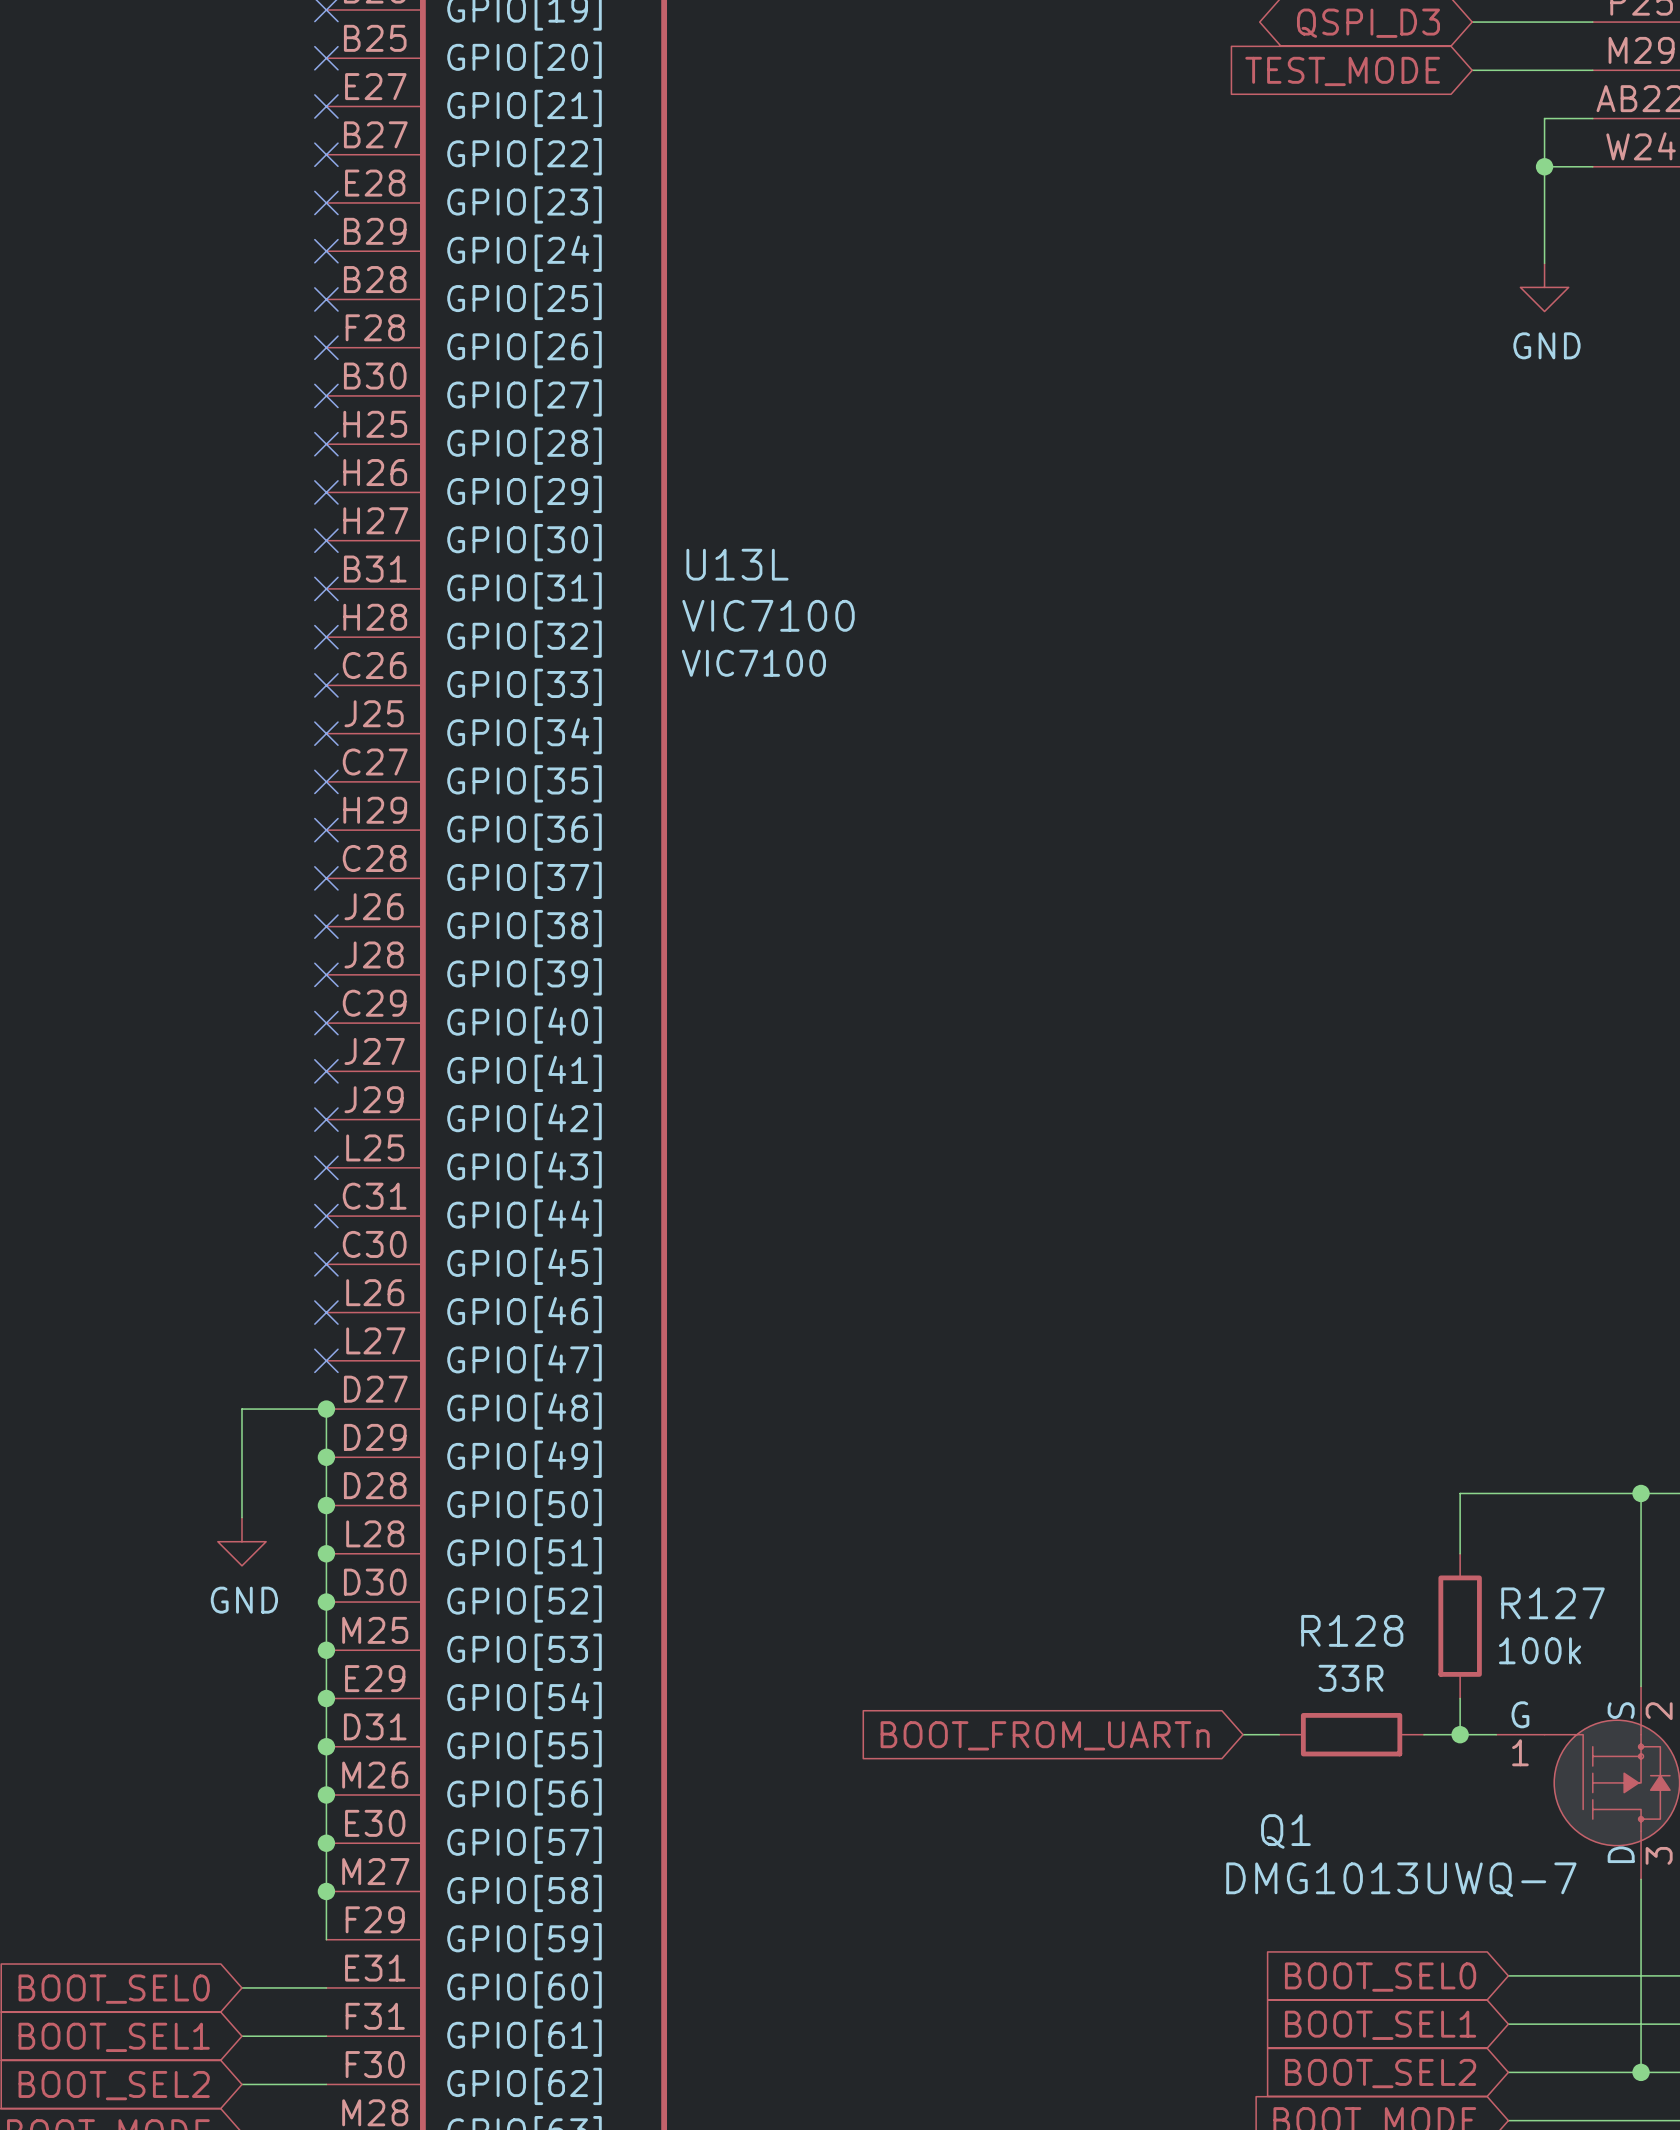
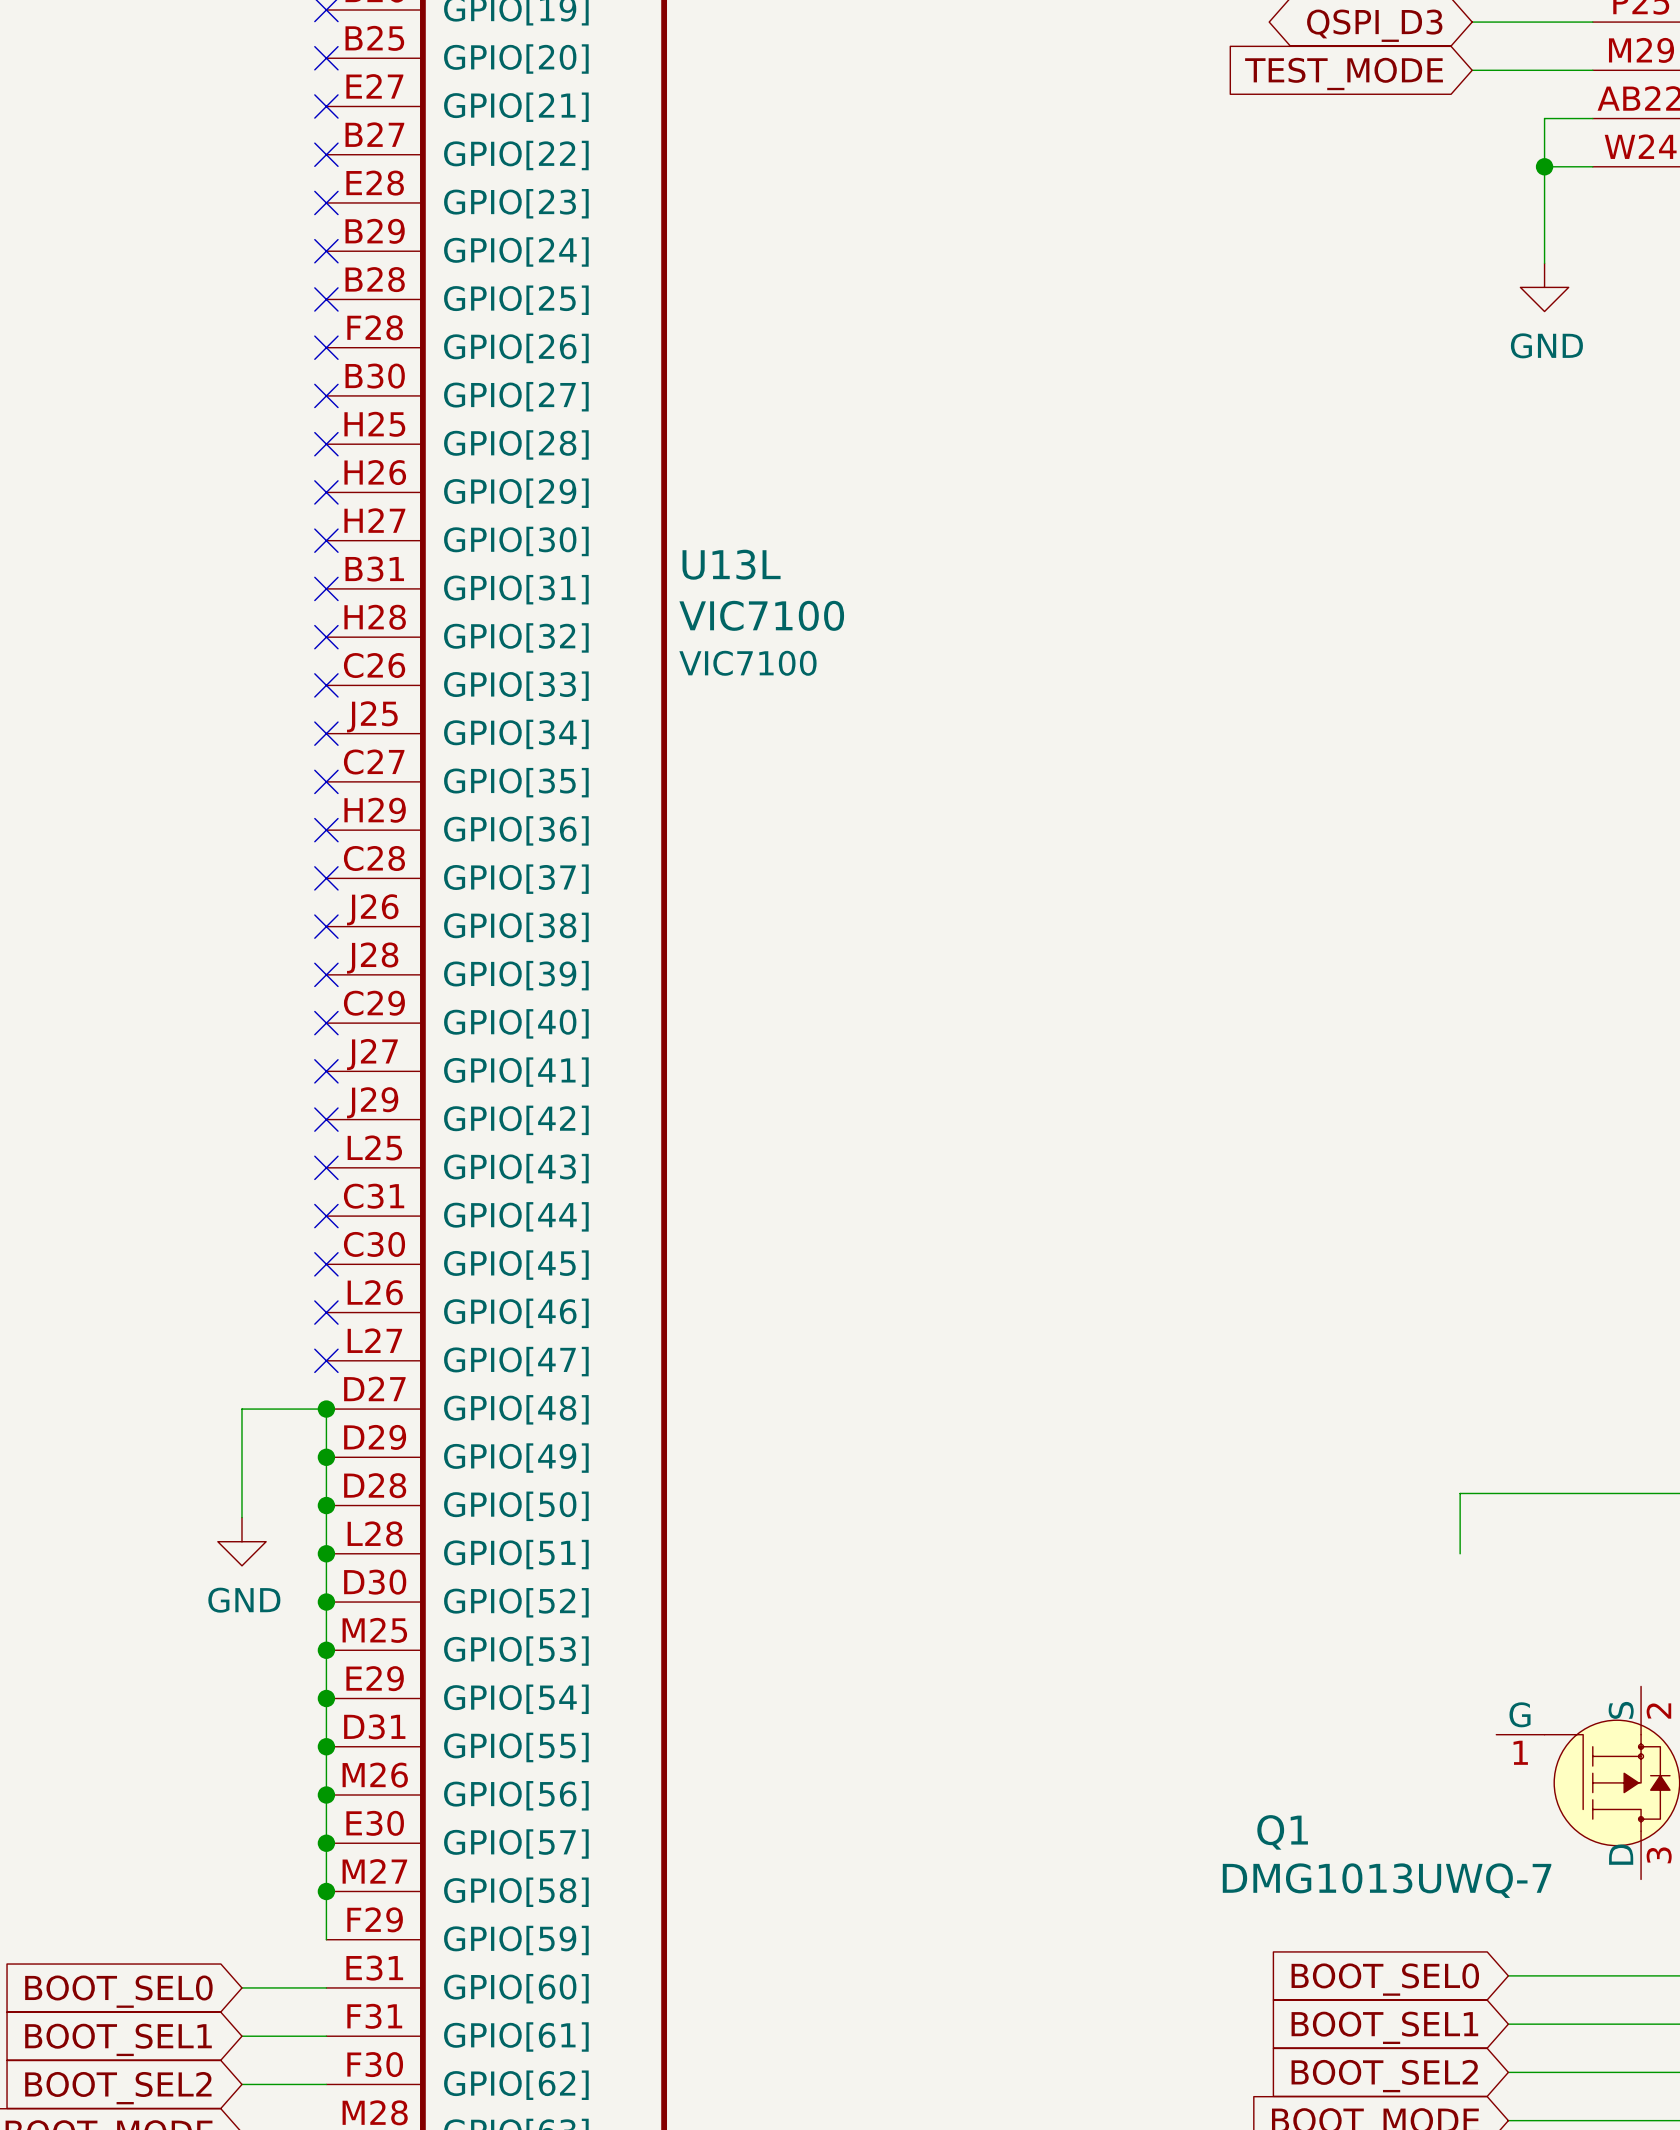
wire: (1641, 1493) (1641, 1686) -> none
junction: (1641, 1493) -> none
R127: (1460, 1626) -> none
wire: (1460, 1698) (1460, 1734) -> none
wire: (1243, 1734) (1279, 1734) -> none
R128: (1351, 1734) -> none
wire: (1423, 1734) (1496, 1734) -> none
junction: (1460, 1734) -> none
global label: BOOT_FROM_UARTn (1045, 1735) -> none
wire: (1641, 1879) (1641, 2072) -> none
junction: (1641, 2072) -> none

